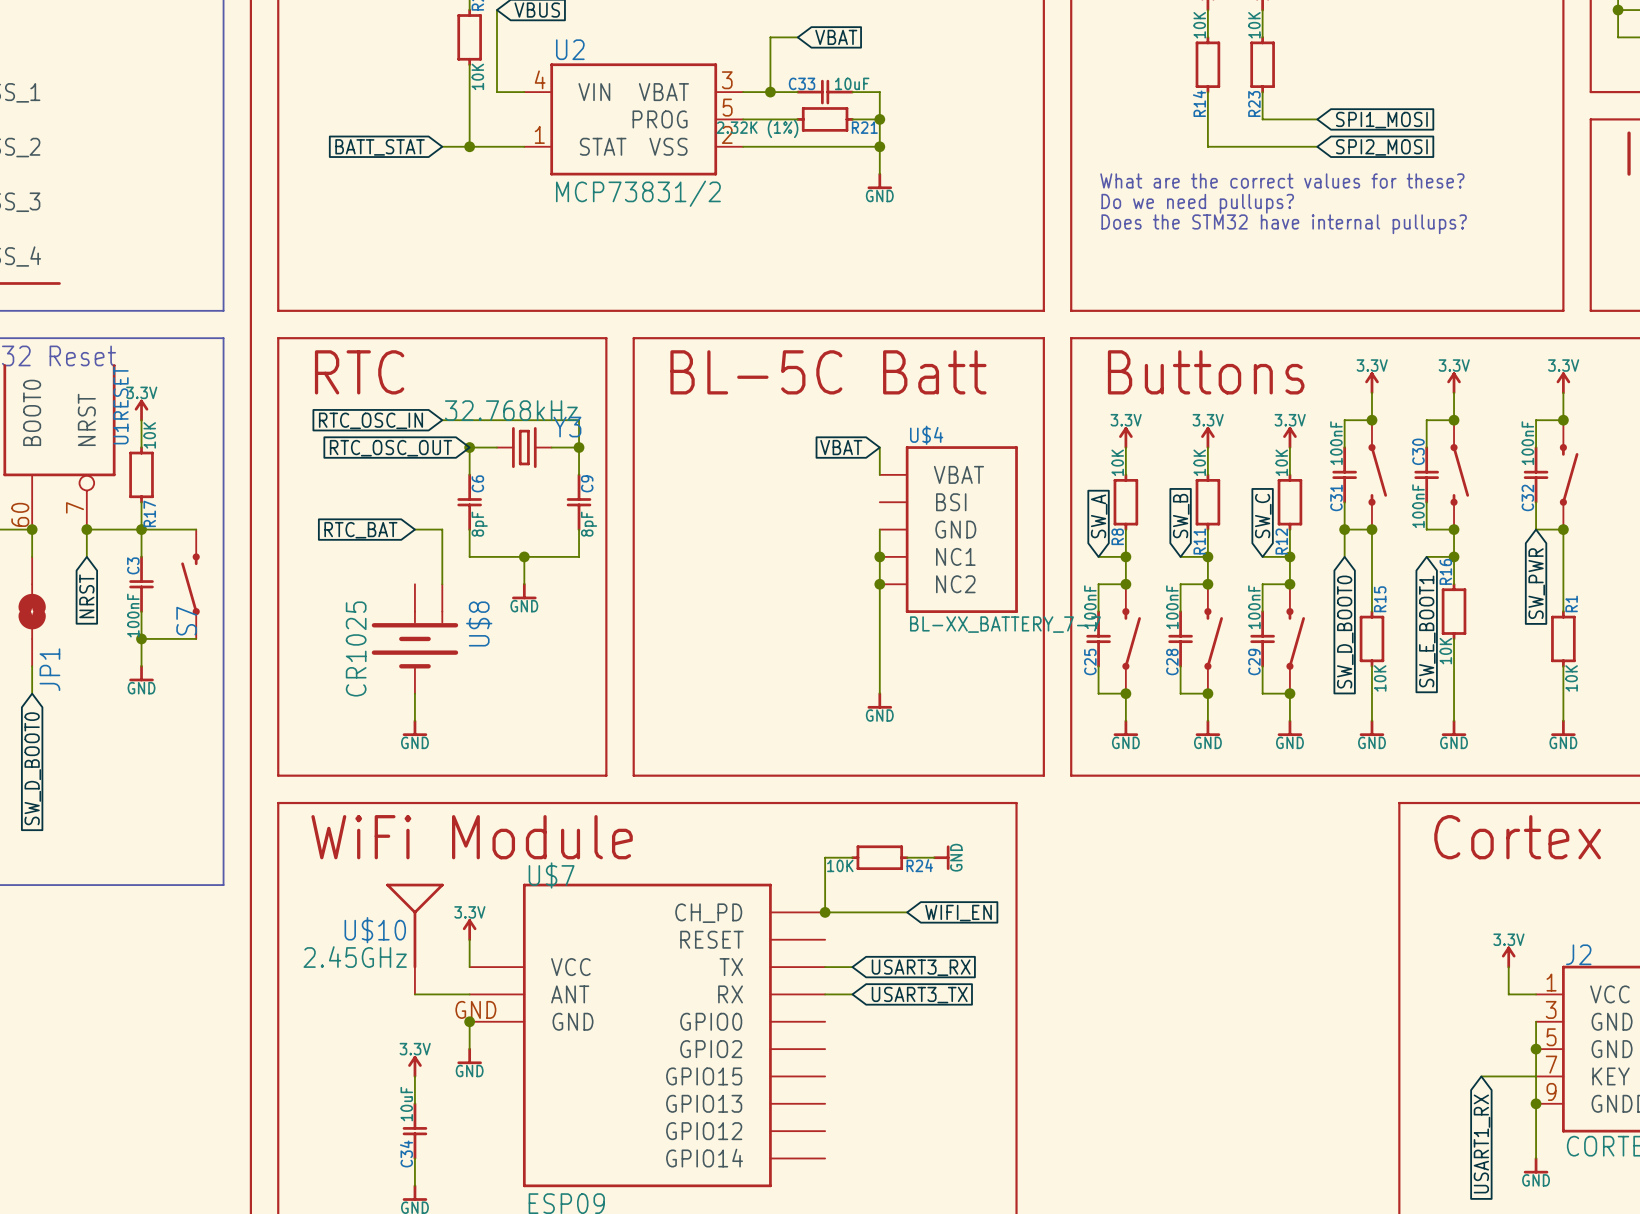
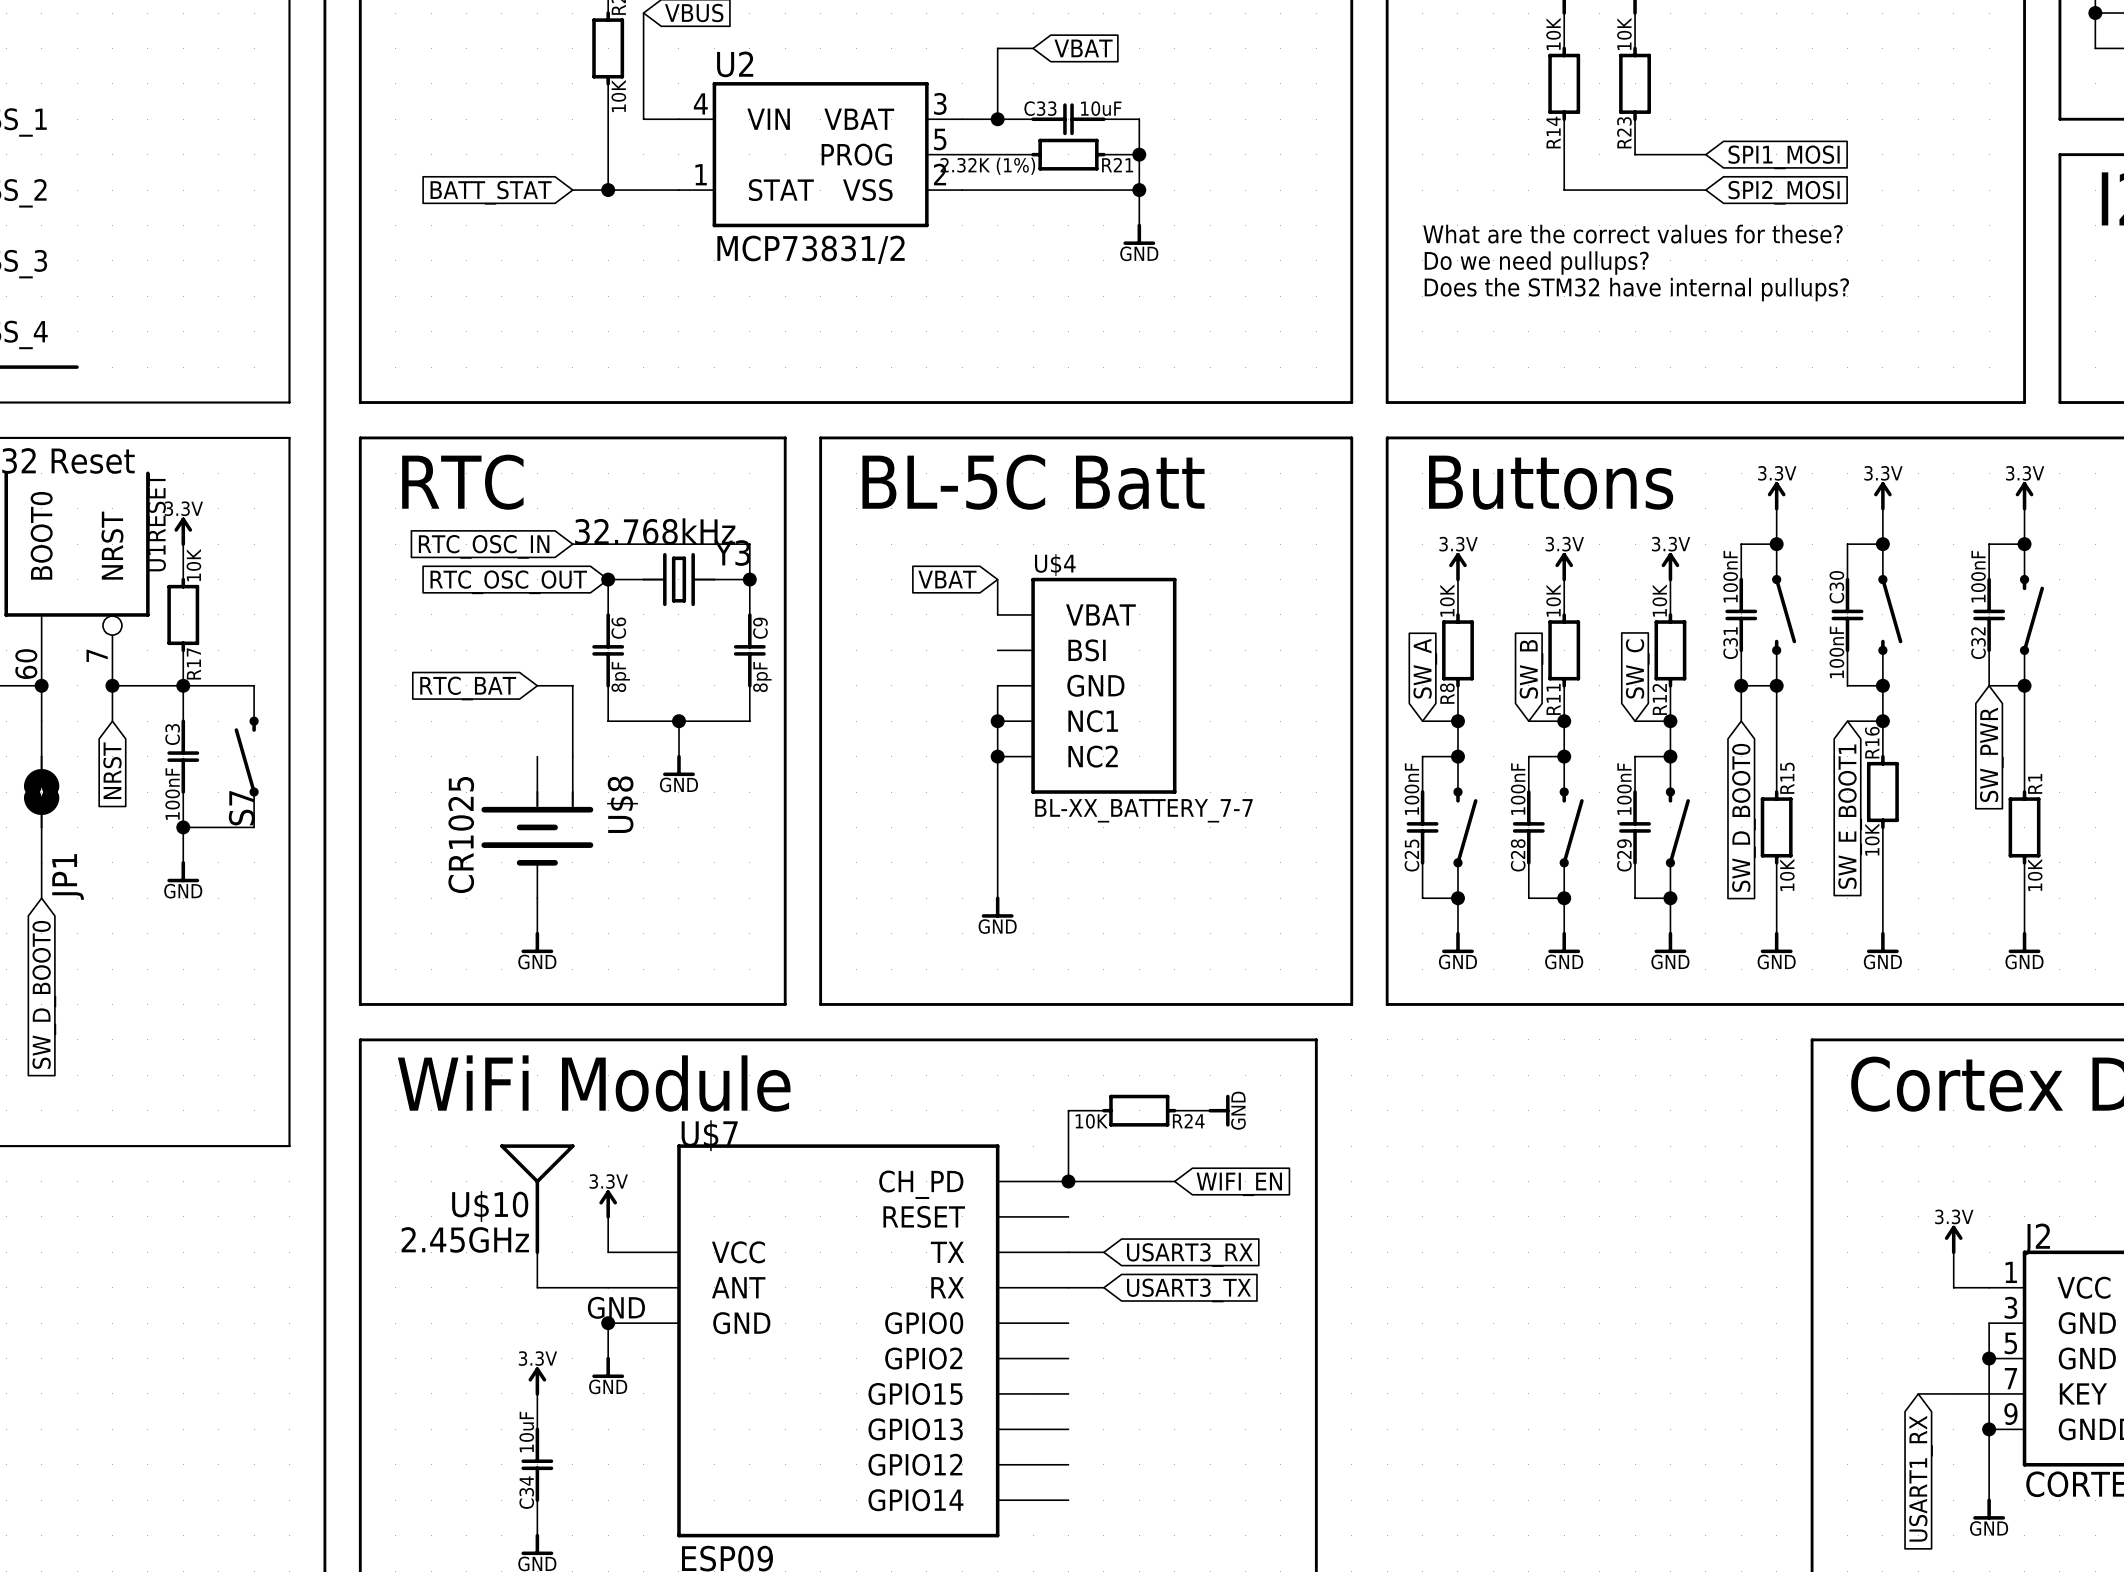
global label position: VBAT (841, 447) -> VBAT (947, 579)
wire: (879, 447) (879, 474) -> (997, 579) (997, 614)
wire: (879, 529) (879, 693) -> (997, 685) (997, 898)
U$4 position: (948, 529) -> (1087, 685)
junction: none -> (997, 721)
junction: (879, 556) -> none
junction: none -> (997, 756)
junction: (879, 584) -> none
power symbol position: GND (879, 700) -> GND (997, 907)

